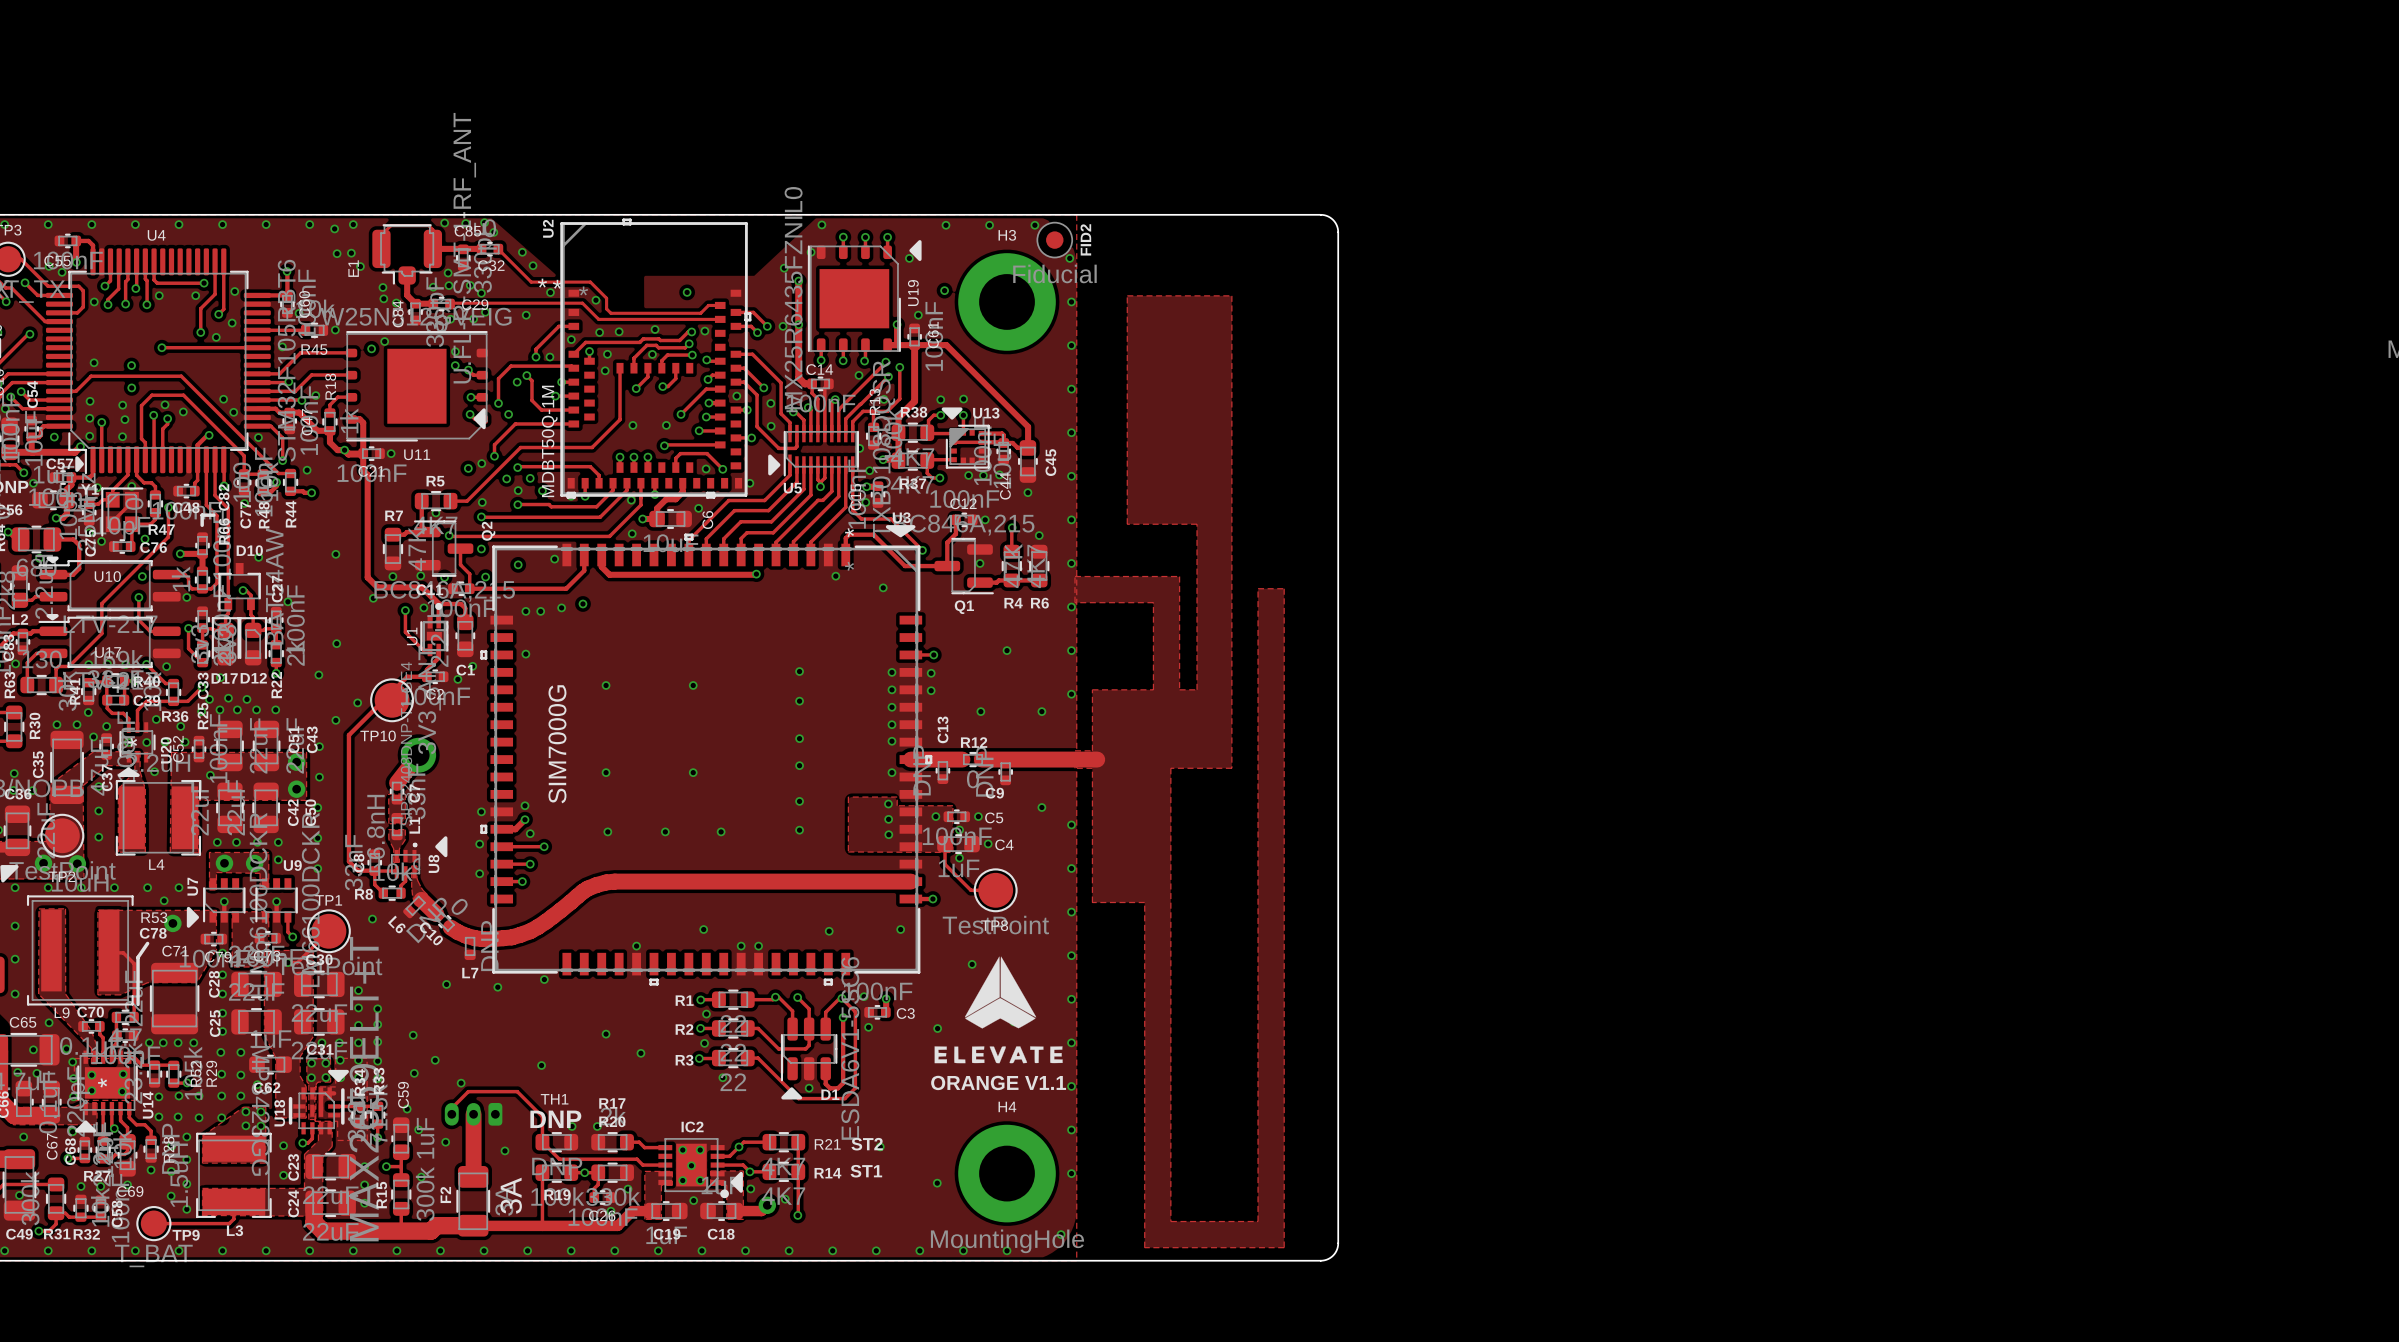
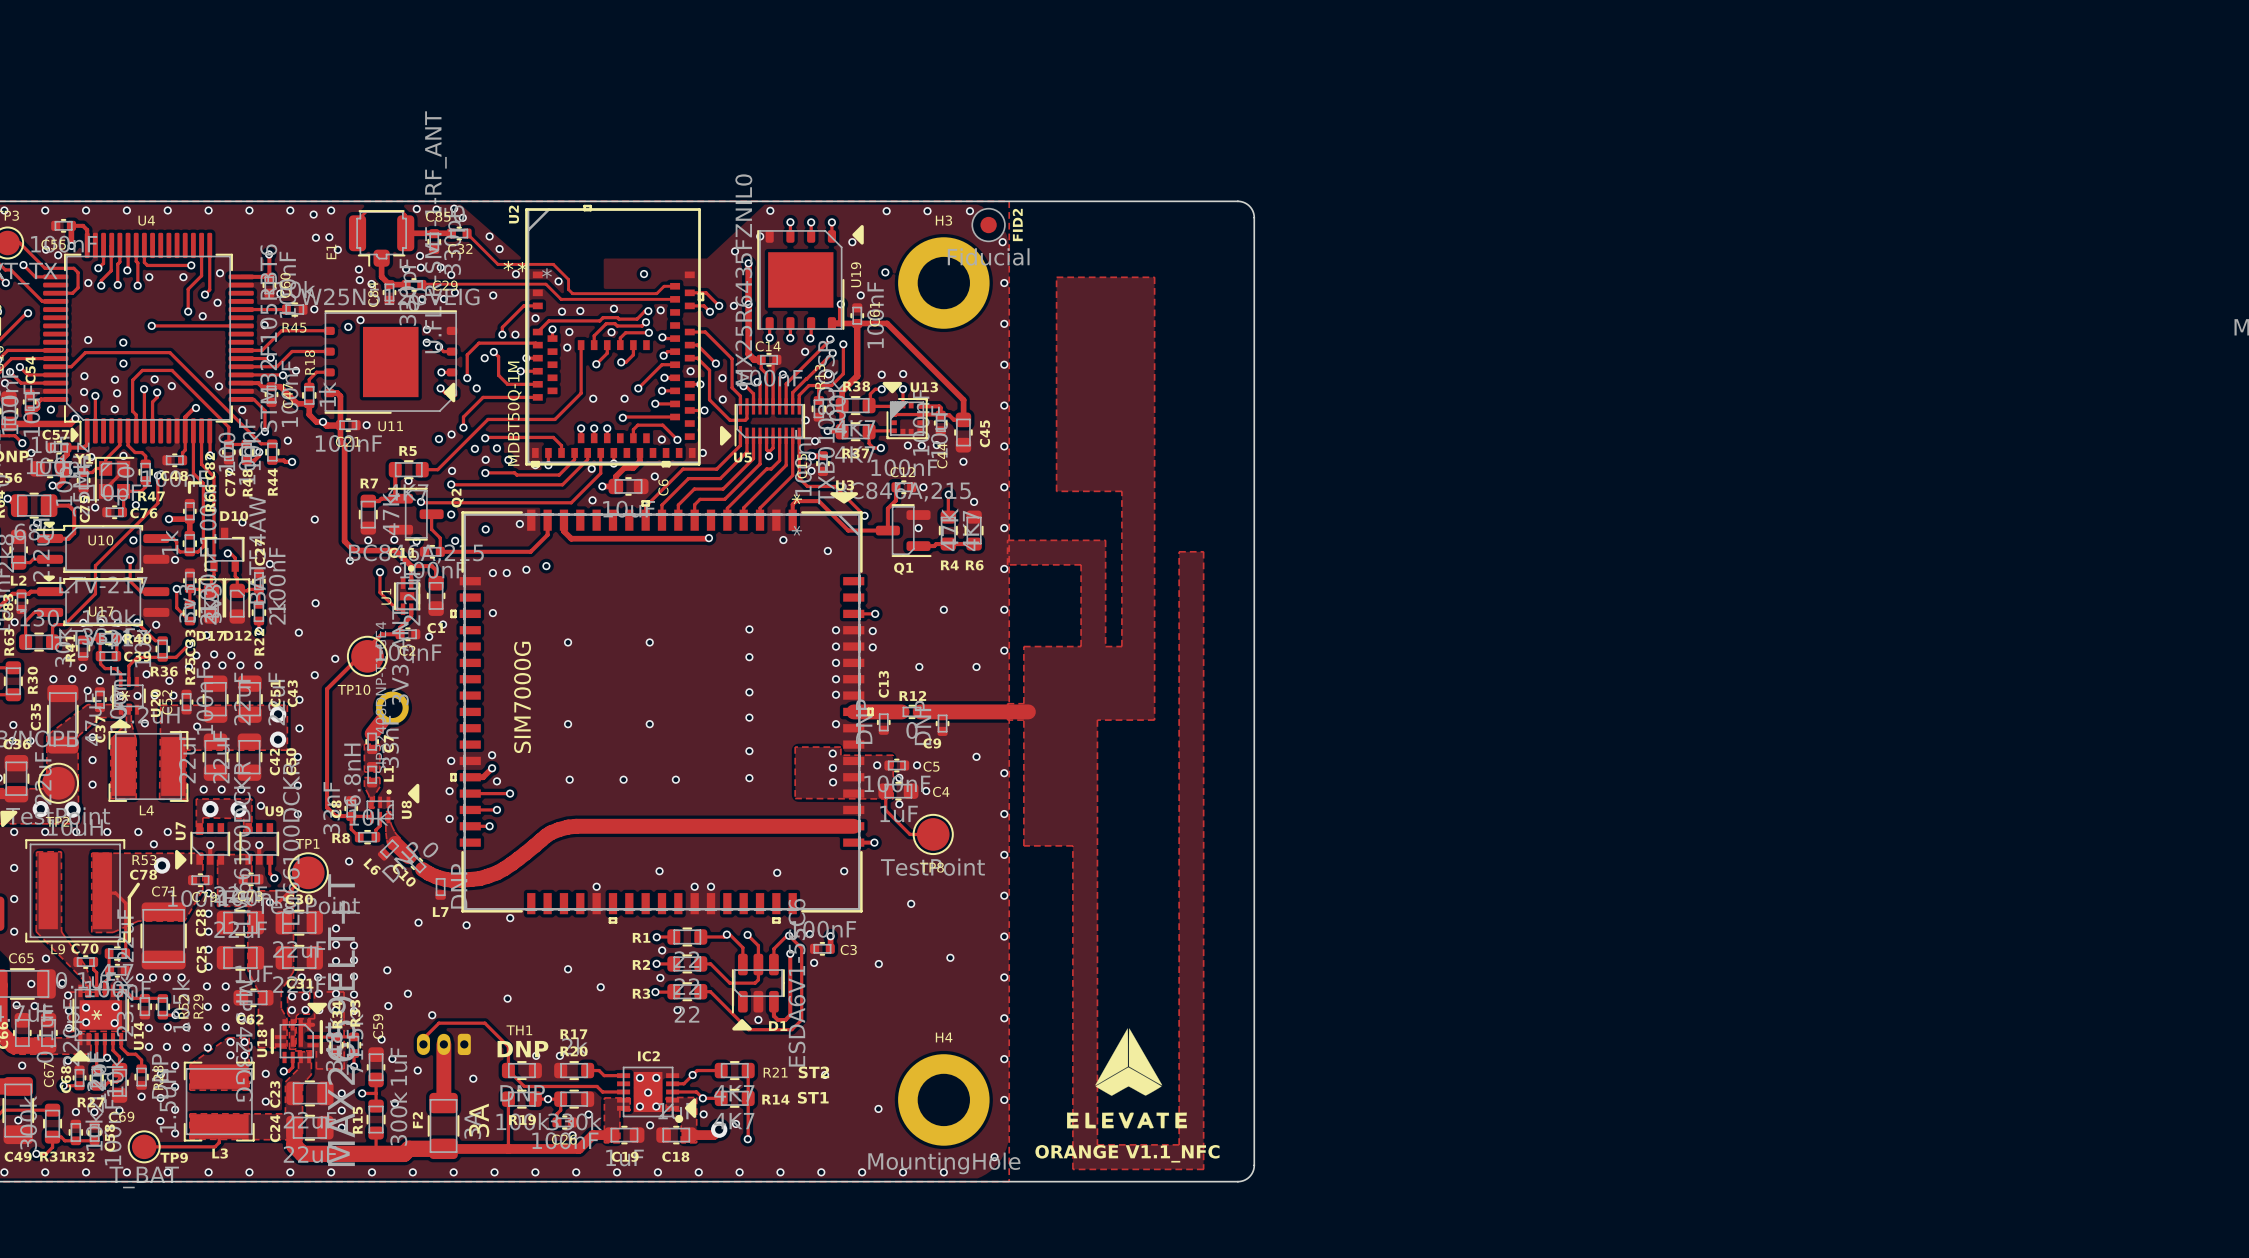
drawing position: (998, 1009) -> (1126, 1078)
text: ORANGE V1.1 (998, 1082) -> none
text: none -> ORANGE V1.1_NFC (1127, 1153)

